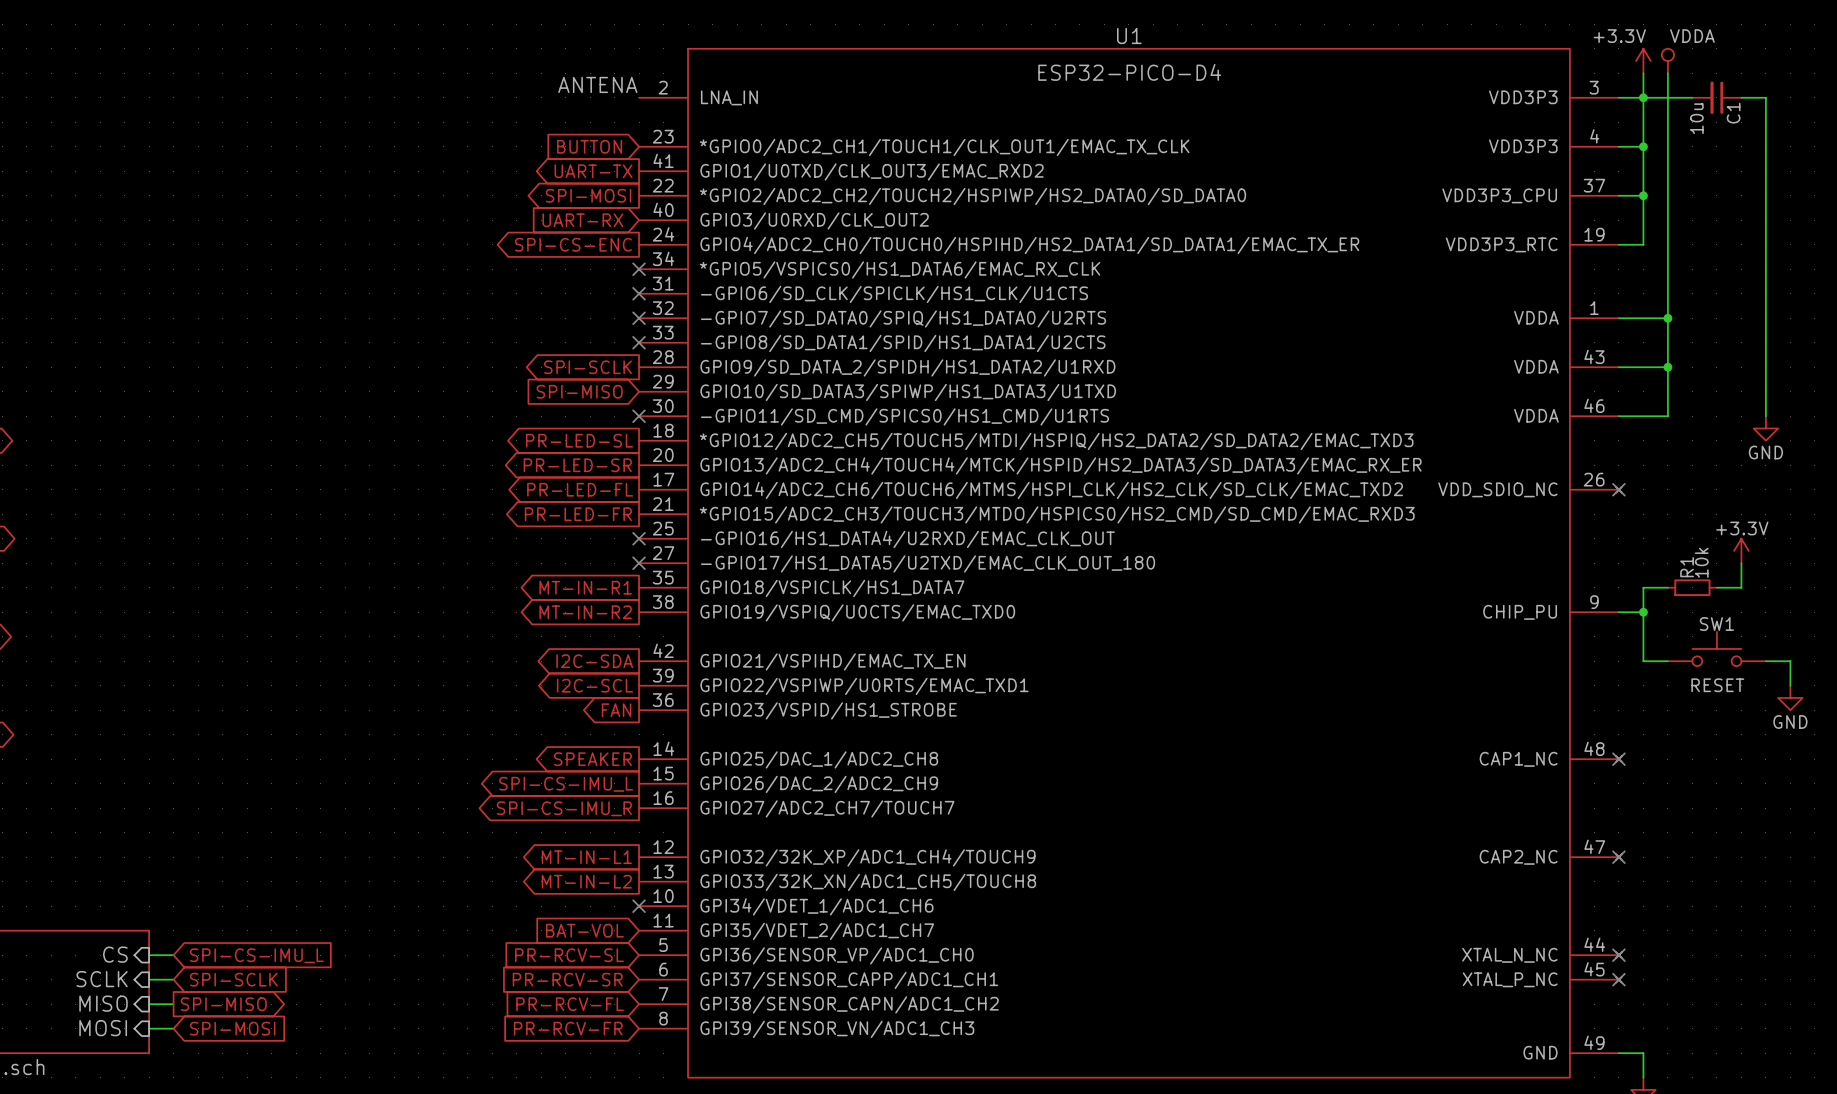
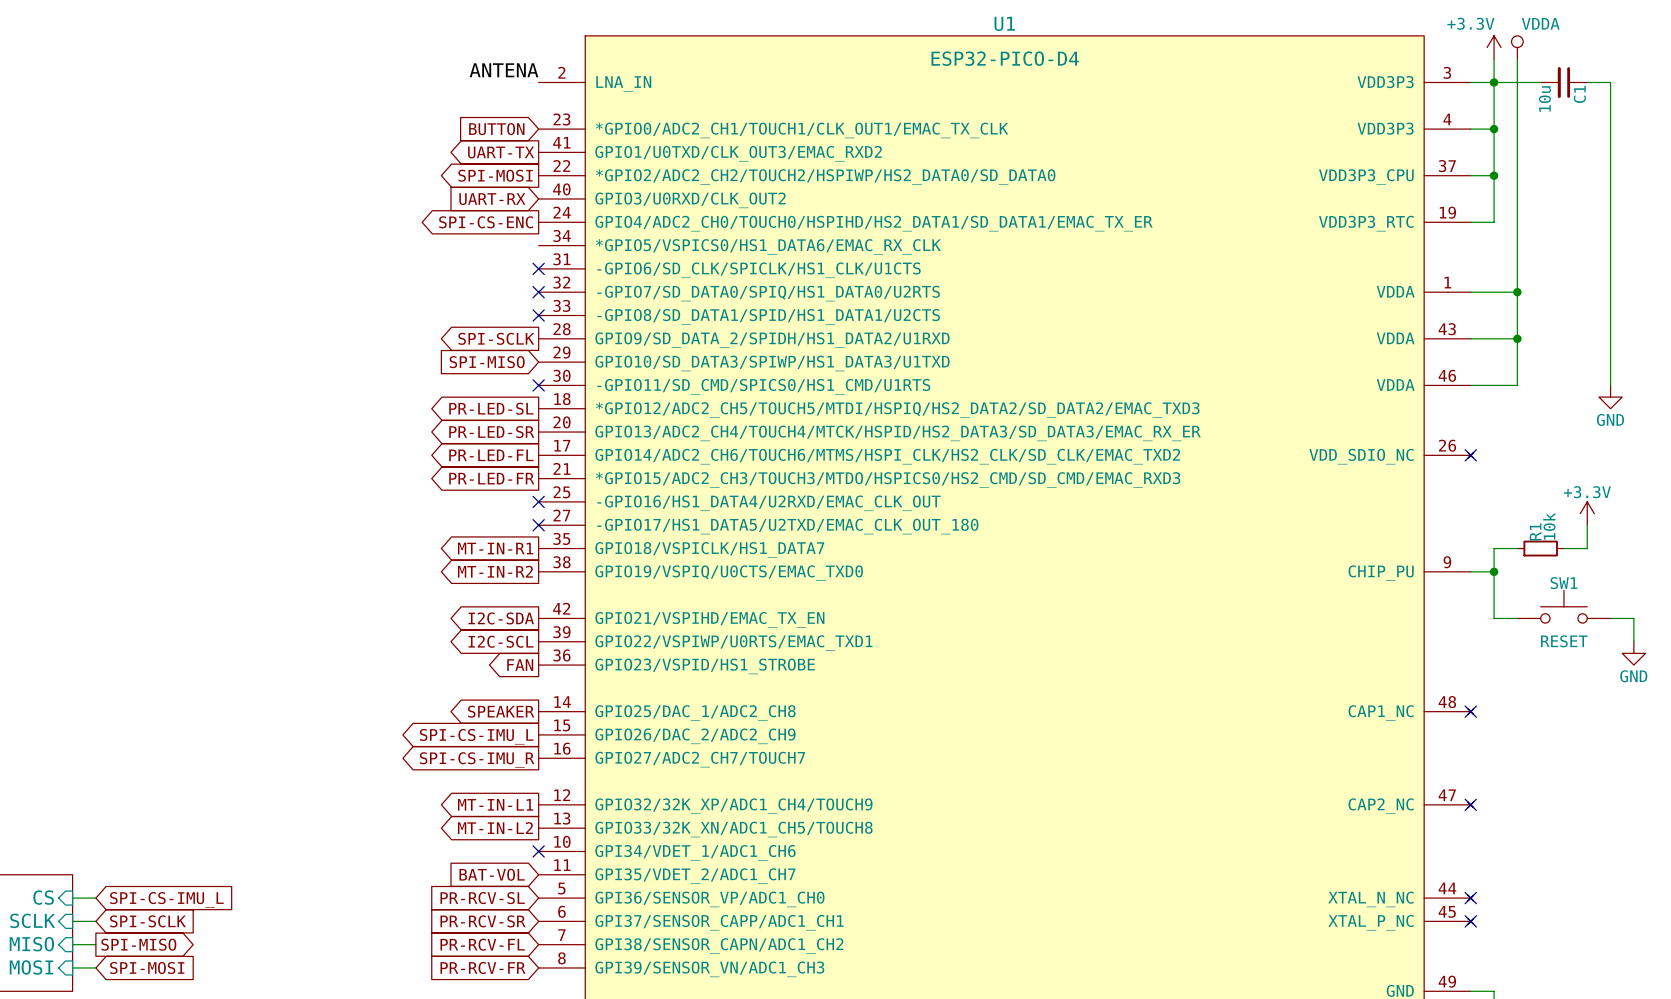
no-connect mark: (639, 269) -> none

